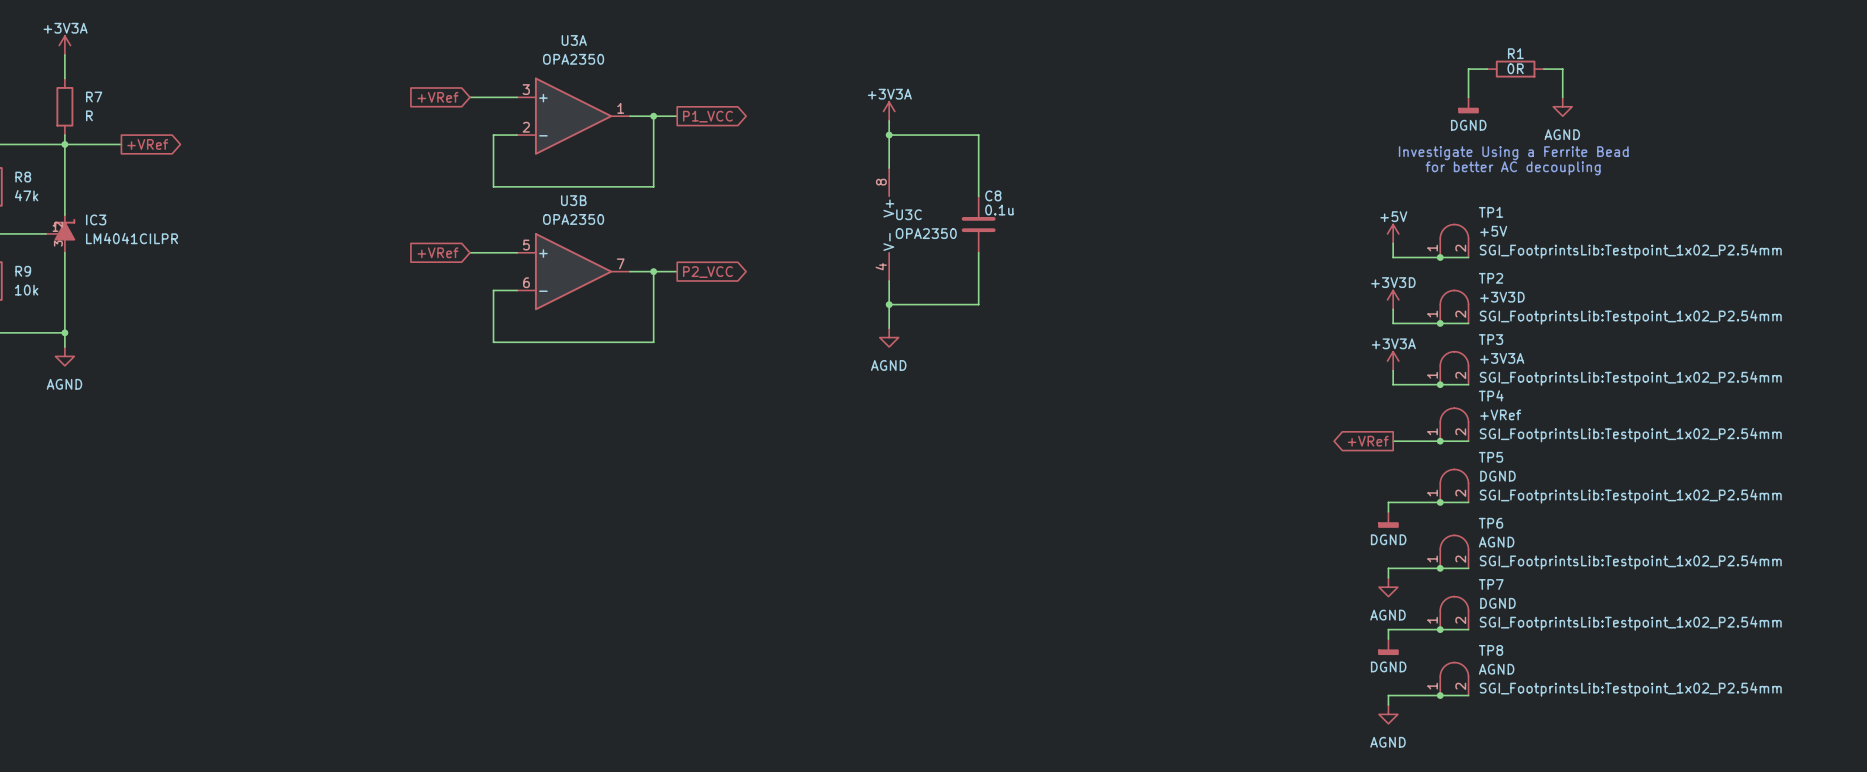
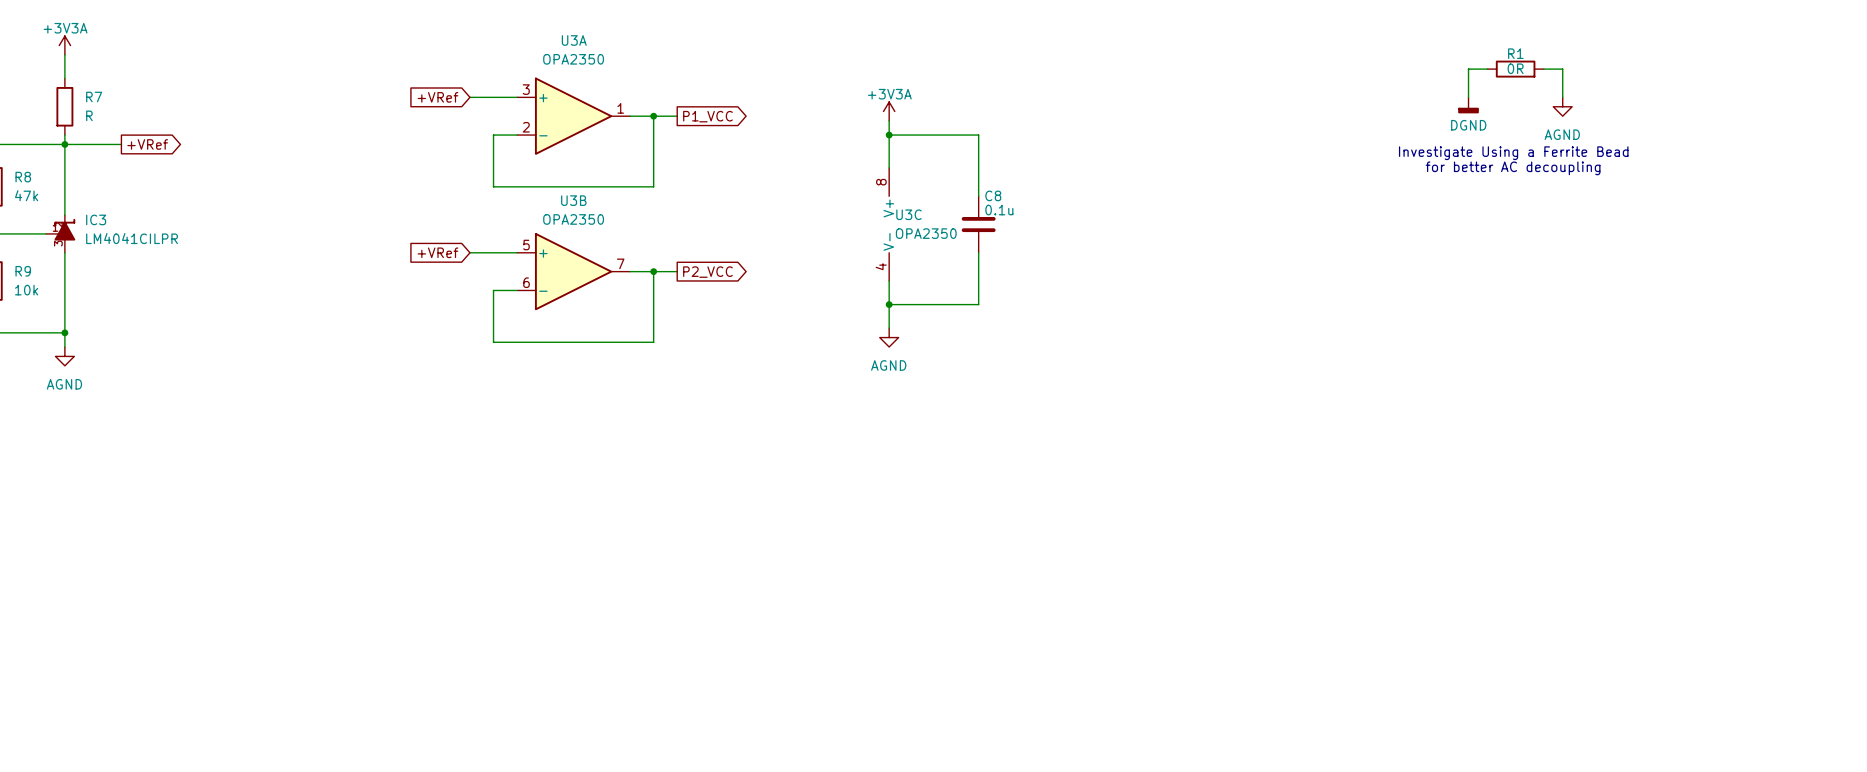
power symbol: +5V (1393, 233) -> none
TP1: +5V (1454, 241) -> none
wire: (1393, 243) (1393, 257) (1468, 257) -> none
junction: (1440, 257) -> none
power symbol: +3V3D (1393, 299) -> none
TP2: +3V3D (1454, 306) -> none
wire: (1393, 309) (1393, 323) (1468, 323) -> none
junction: (1440, 323) -> none
power symbol: +3V3A (1393, 361) -> none
TP3: +3V3A (1454, 368) -> none
wire: (1393, 370) (1393, 384) (1468, 384) -> none
junction: (1440, 384) -> none
TP4: +VRef (1454, 424) -> none
global label: +VRef (1368, 441) -> none
wire: (1393, 441) (1468, 441) -> none
junction: (1440, 441) -> none
TP5: DGND (1454, 485) -> none
junction: (1440, 502) -> none
wire: (1468, 502) (1388, 502) (1388, 511) -> none
power symbol: DGND (1388, 519) -> none
TP6: AGND (1454, 551) -> none
junction: (1440, 568) -> none
wire: (1468, 568) (1388, 568) (1388, 577) -> none
power symbol: AGND (1388, 587) -> none
TP7: DGND (1454, 613) -> none
junction: (1440, 629) -> none
wire: (1468, 629) (1388, 629) (1388, 639) -> none
power symbol: DGND (1388, 647) -> none
TP8: AGND (1454, 679) -> none
junction: (1440, 695) -> none
wire: (1468, 695) (1388, 695) (1388, 704) -> none
power symbol: AGND (1388, 714) -> none

